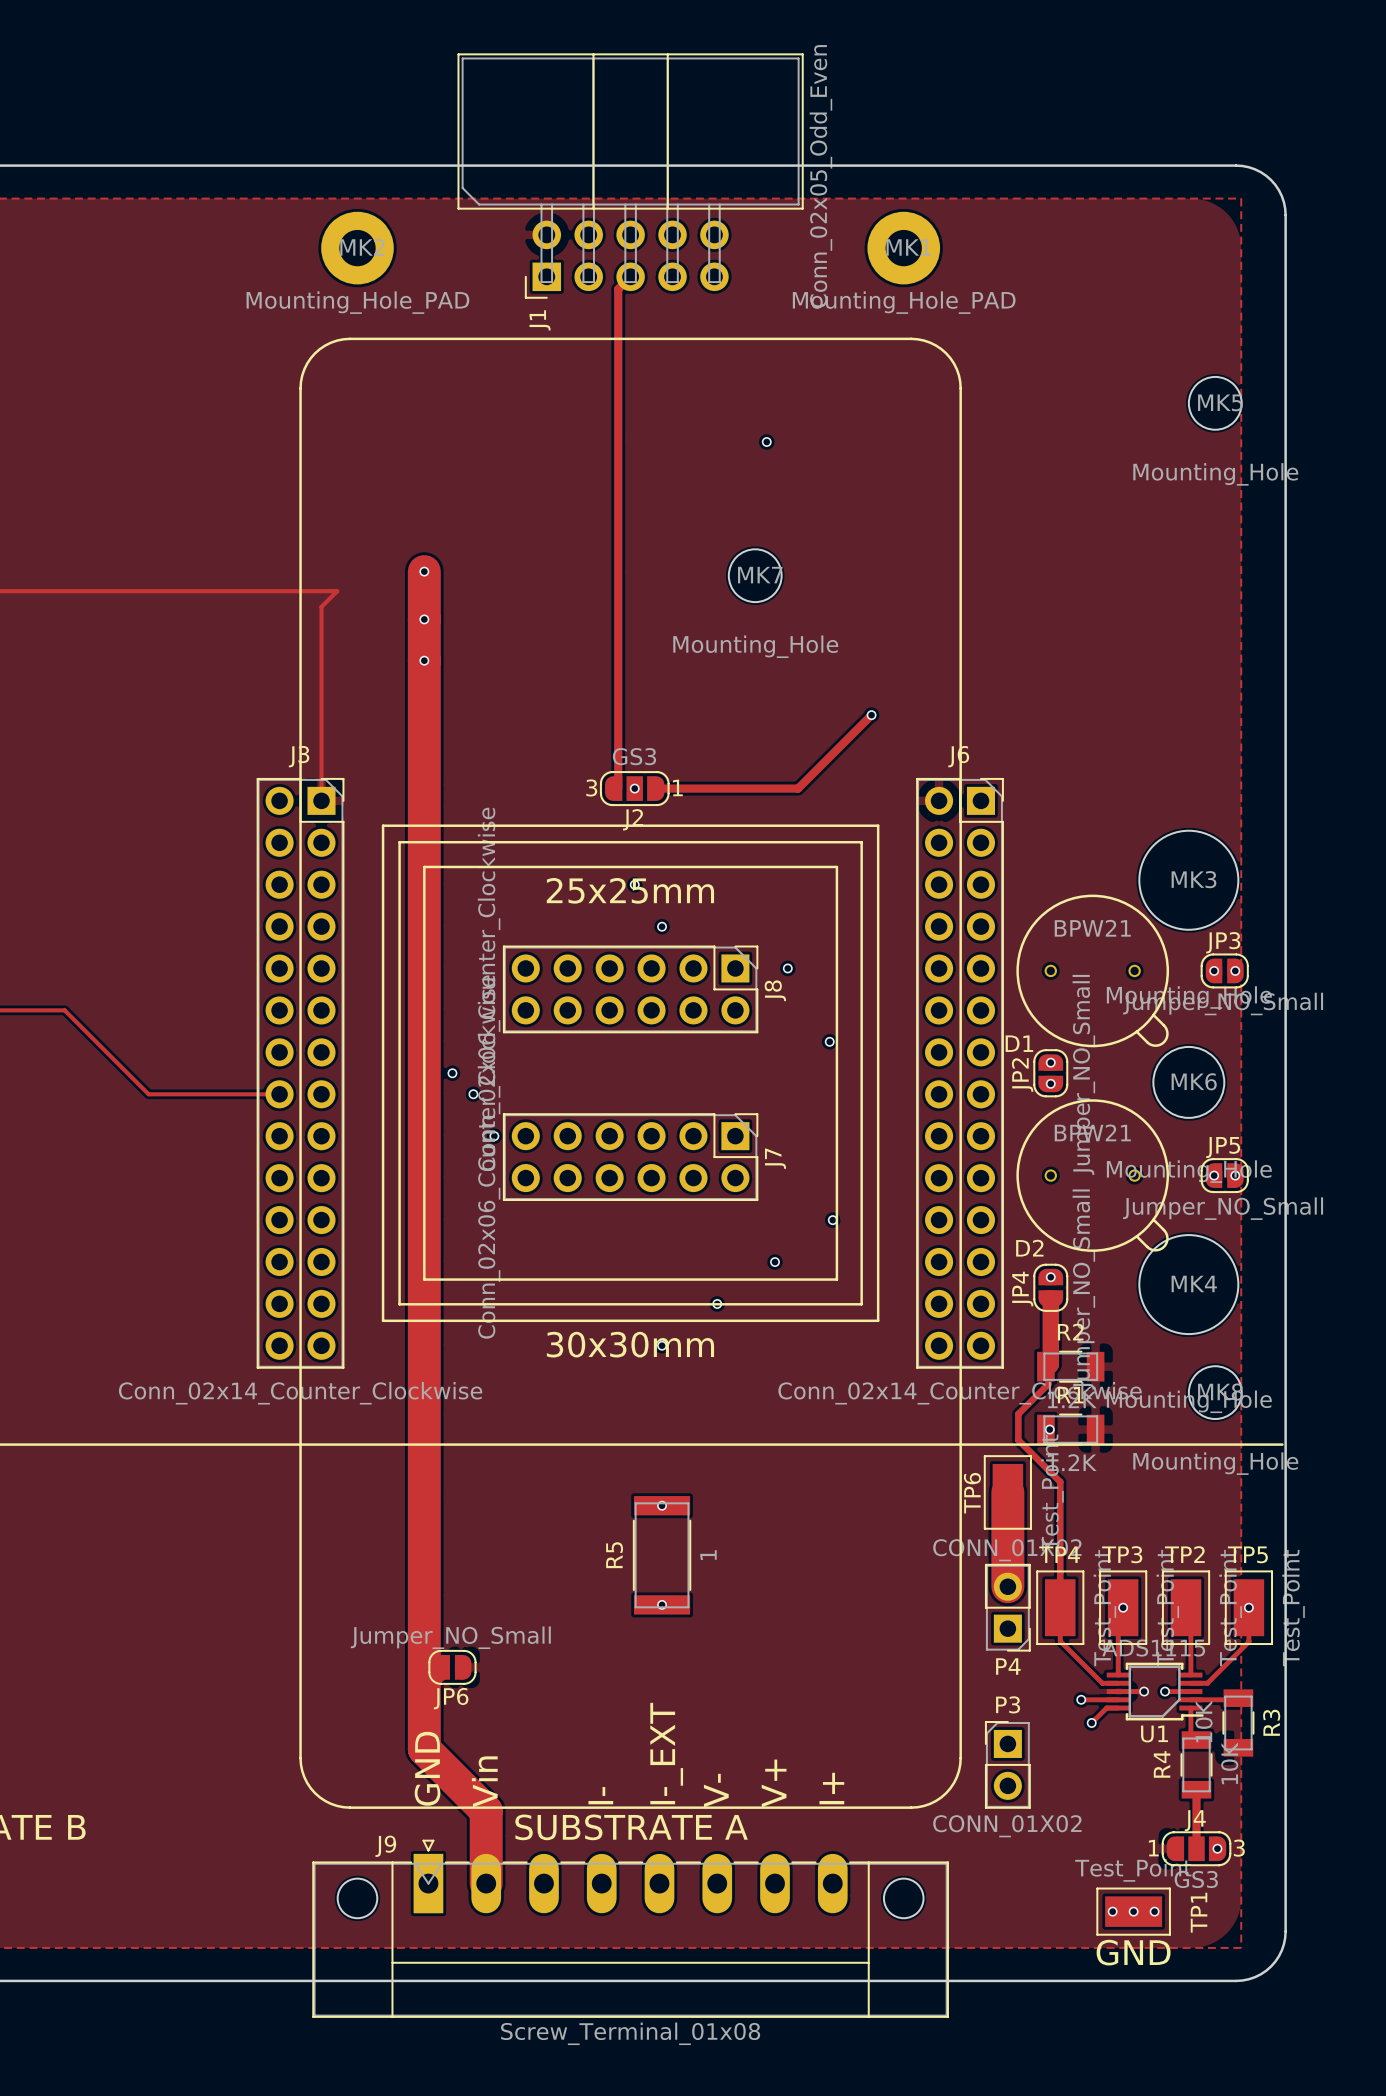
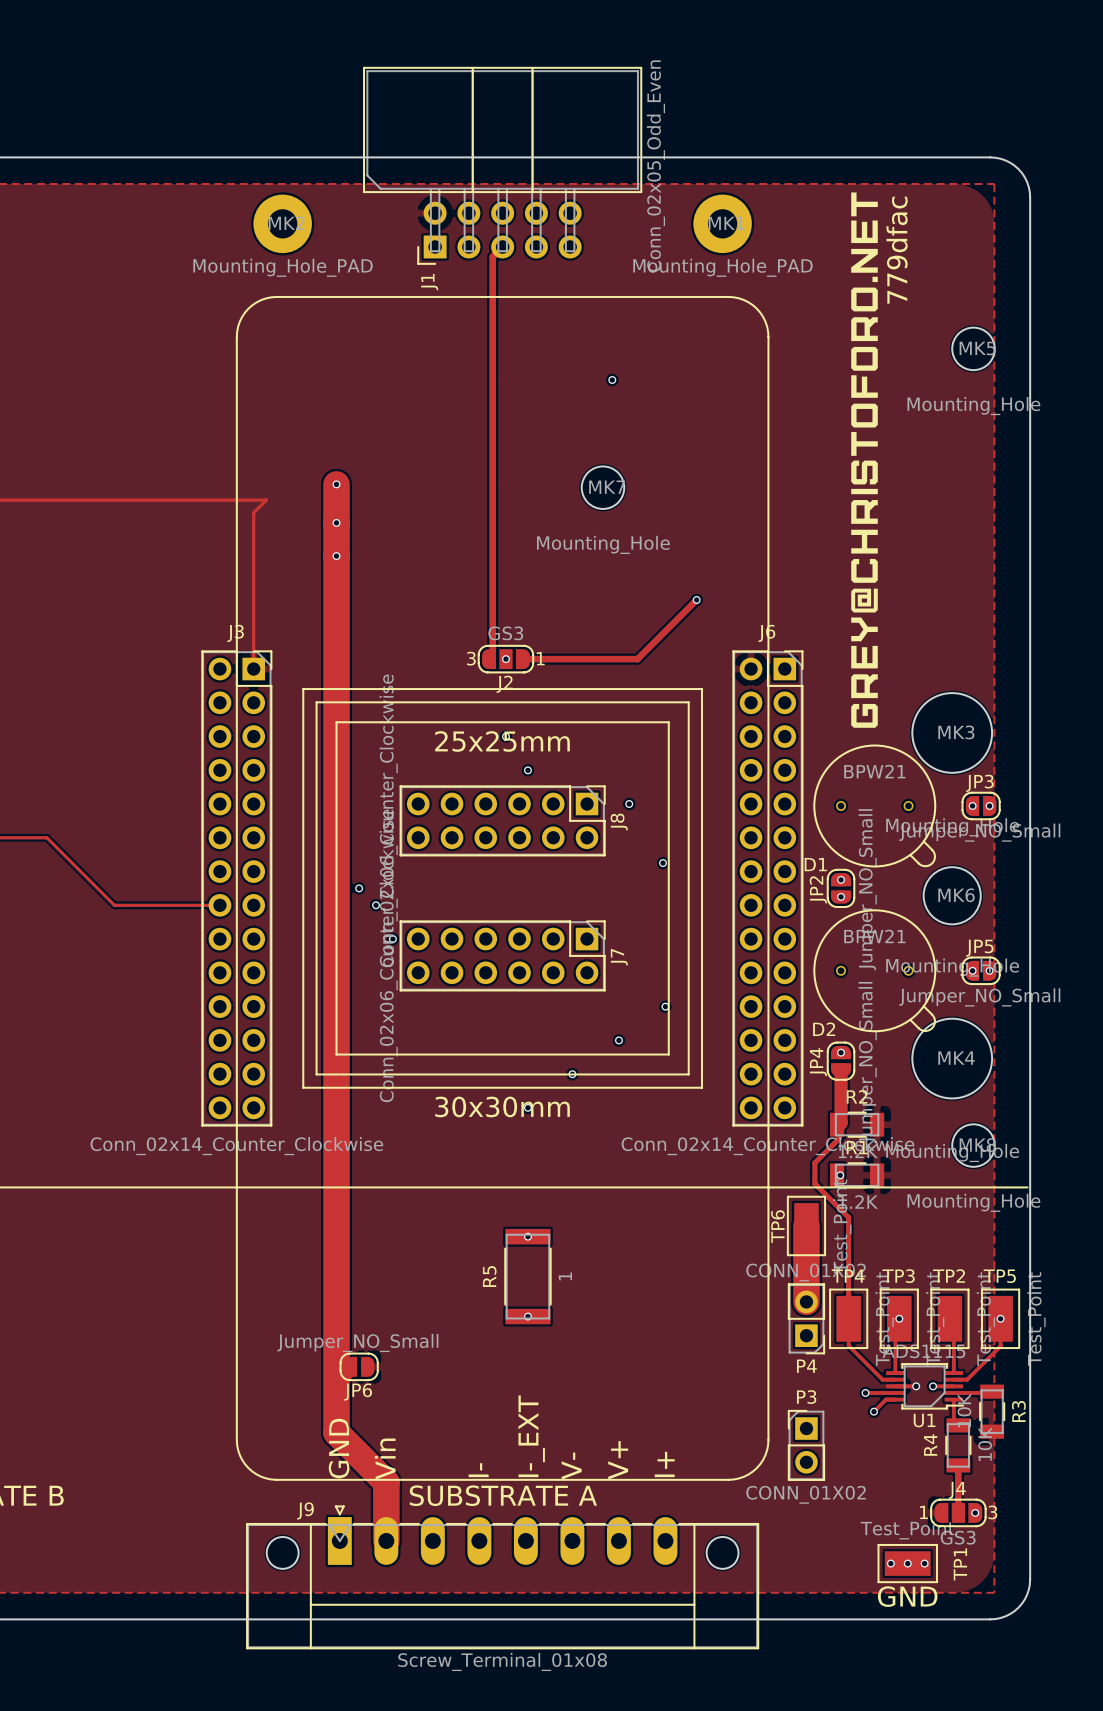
drawing: none -> [851, 192, 878, 728]
text: none -> 779dfac (897, 250)

